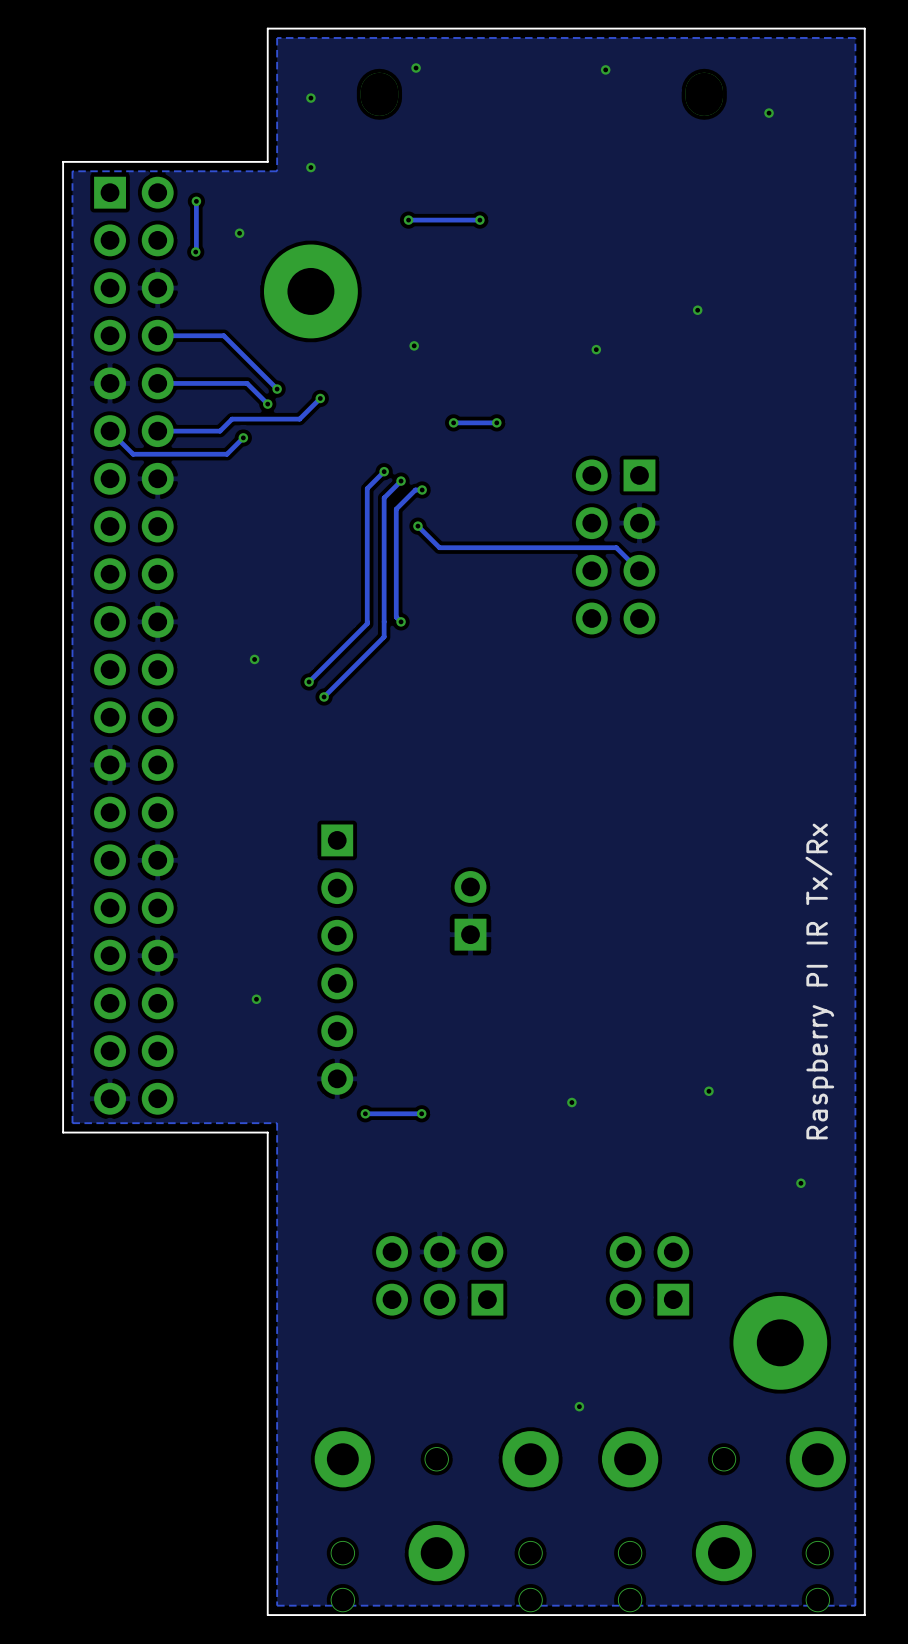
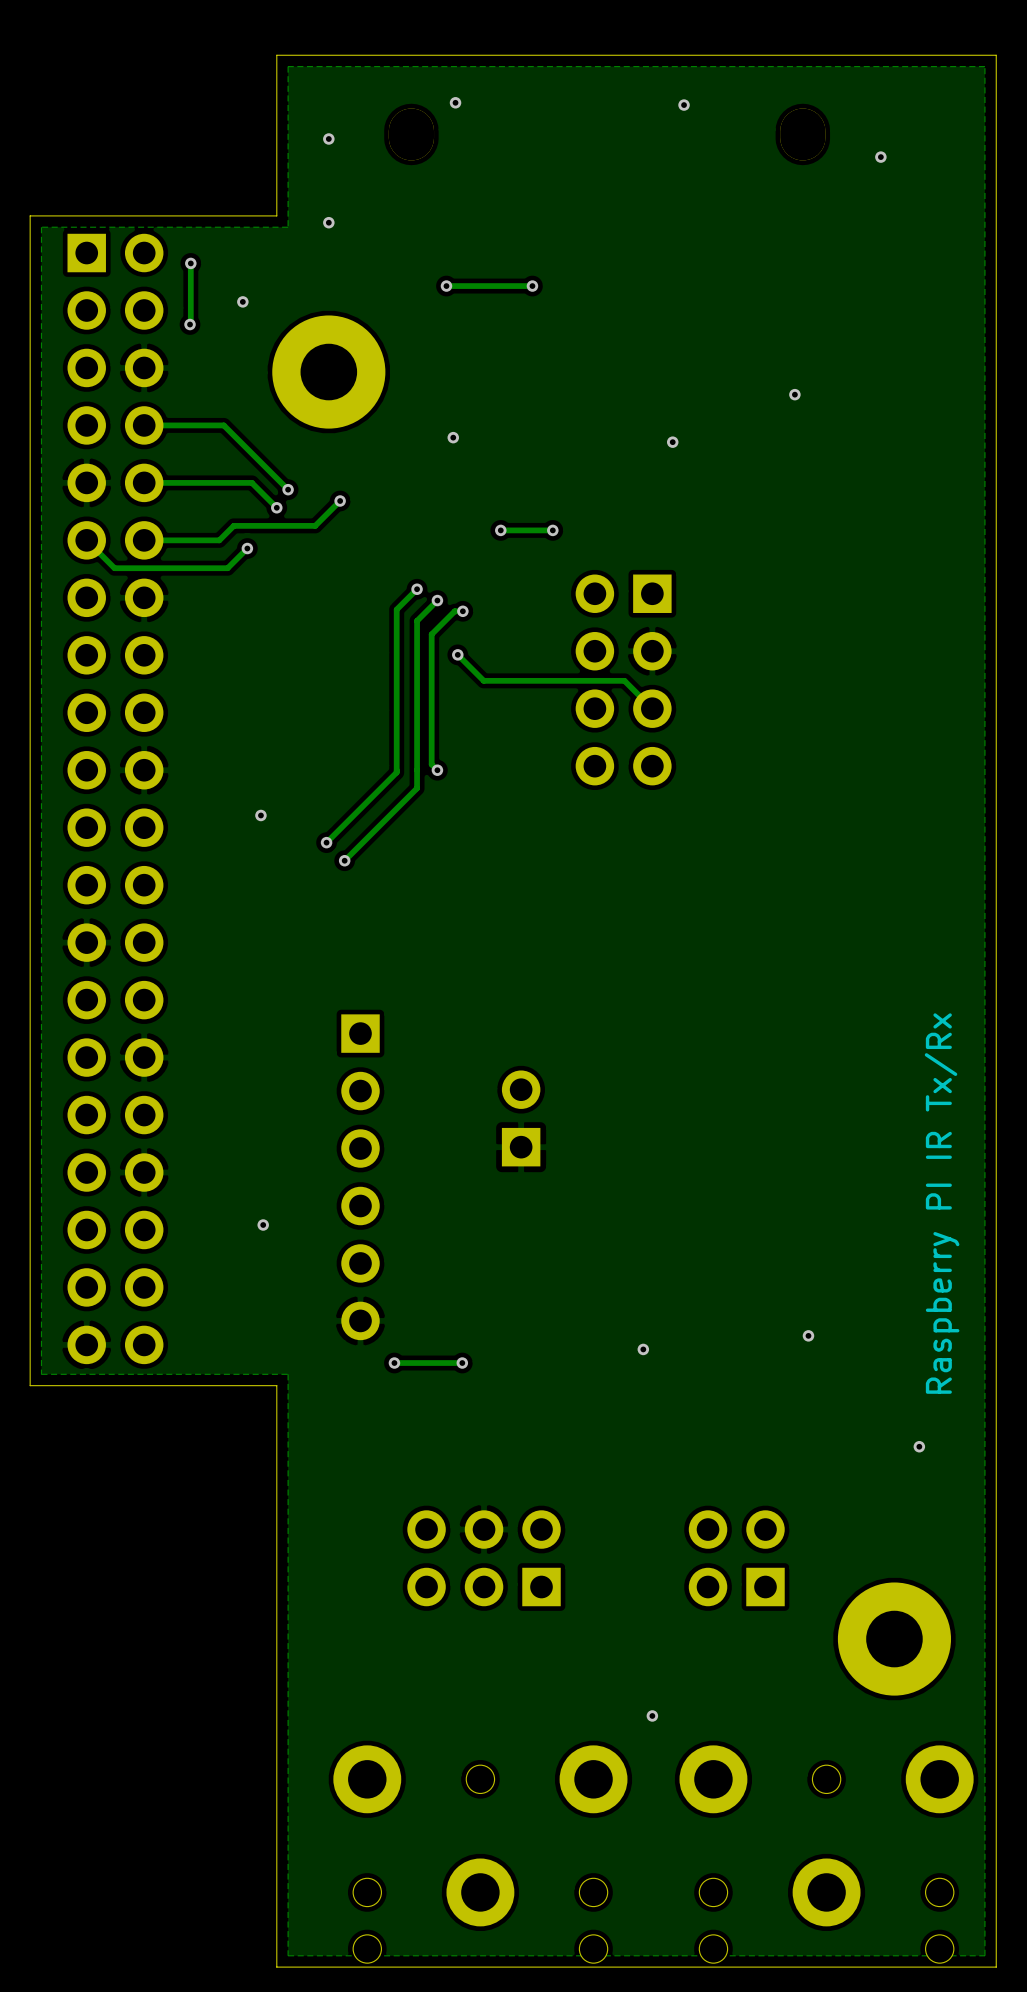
part position: (615, 546) -> (623, 679)
track: (556, 547) (616, 547) (639, 570) -> (624, 680) (652, 708)

